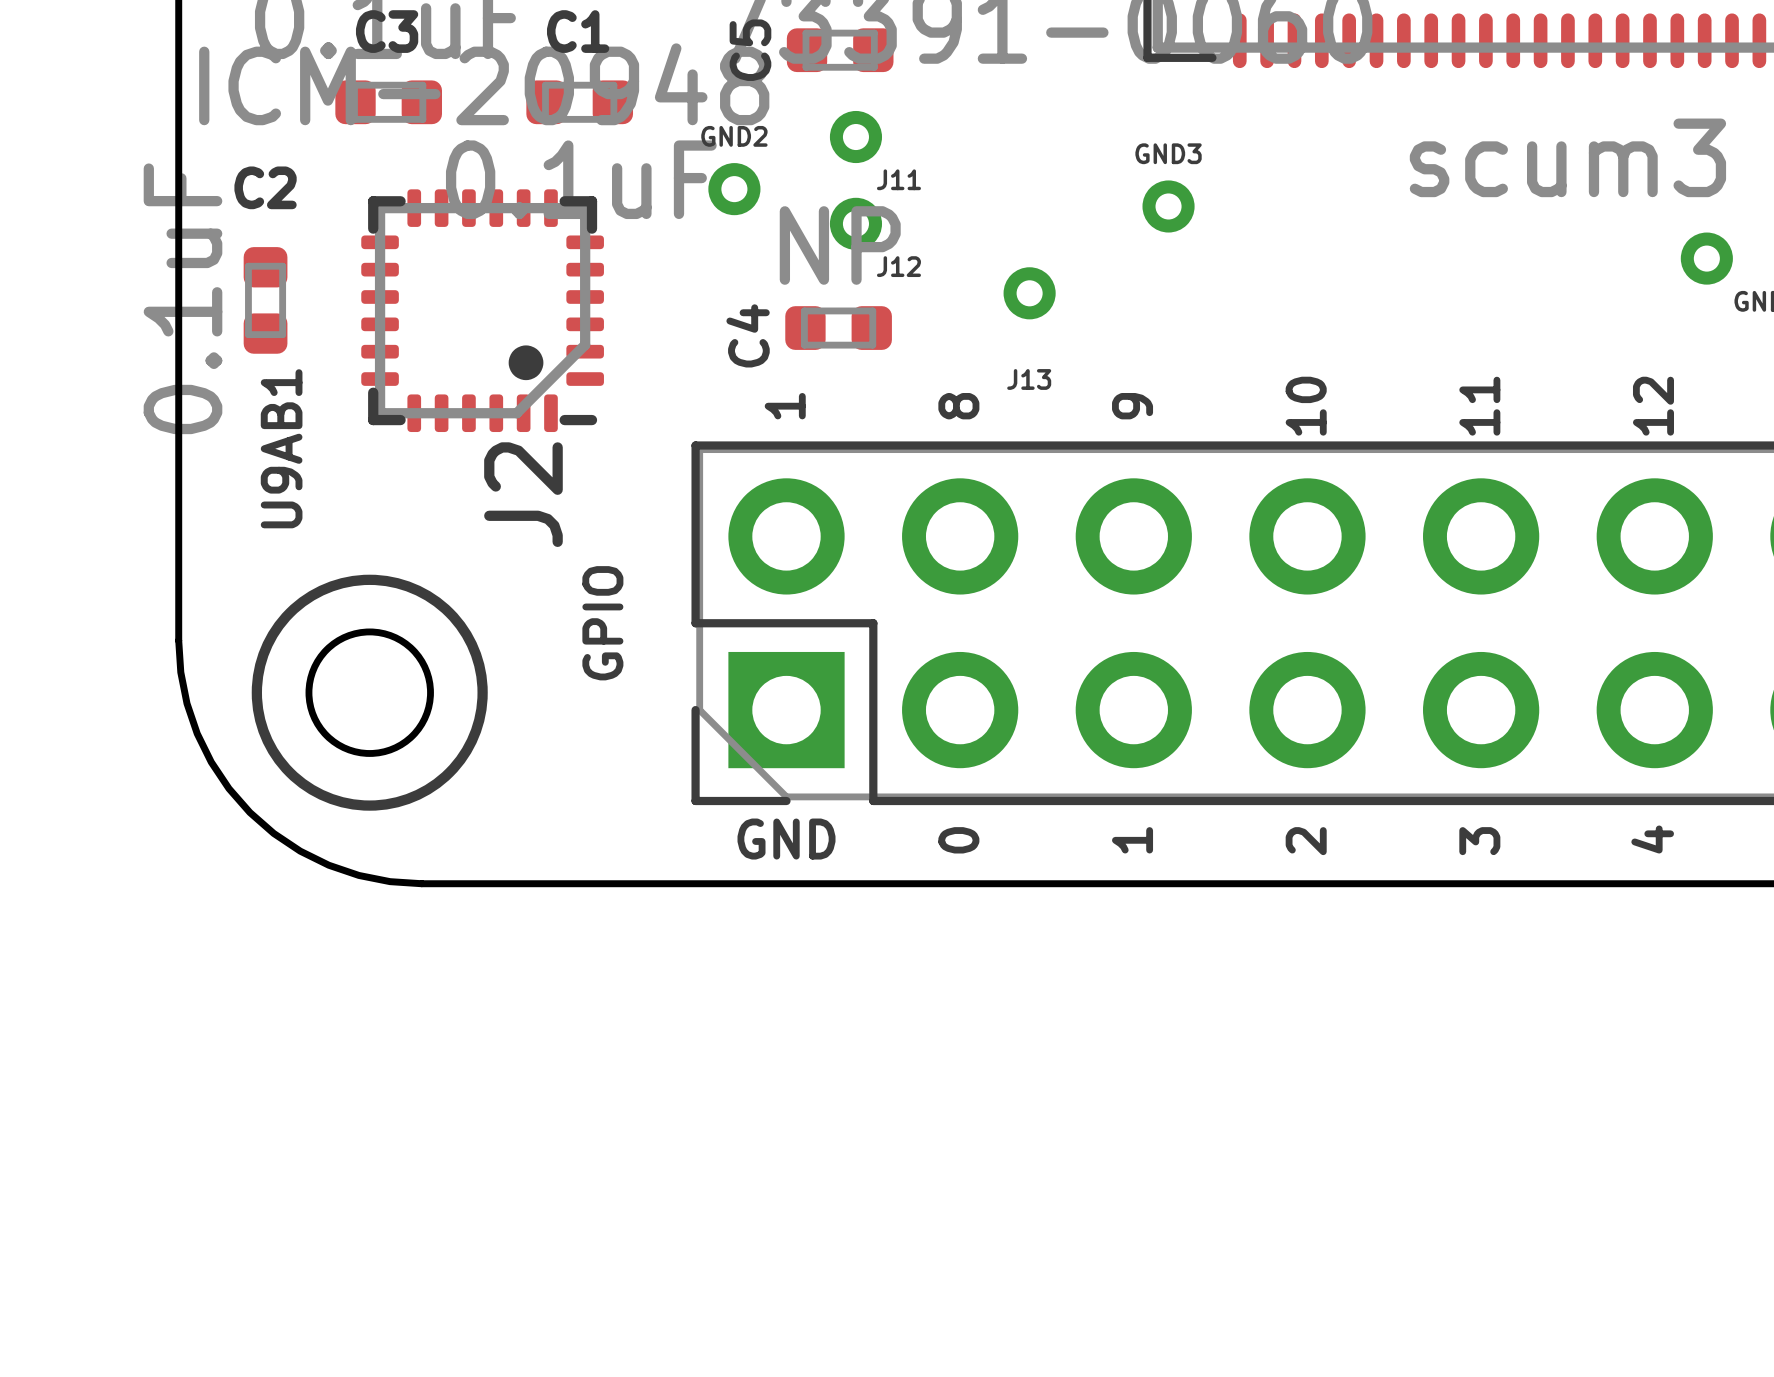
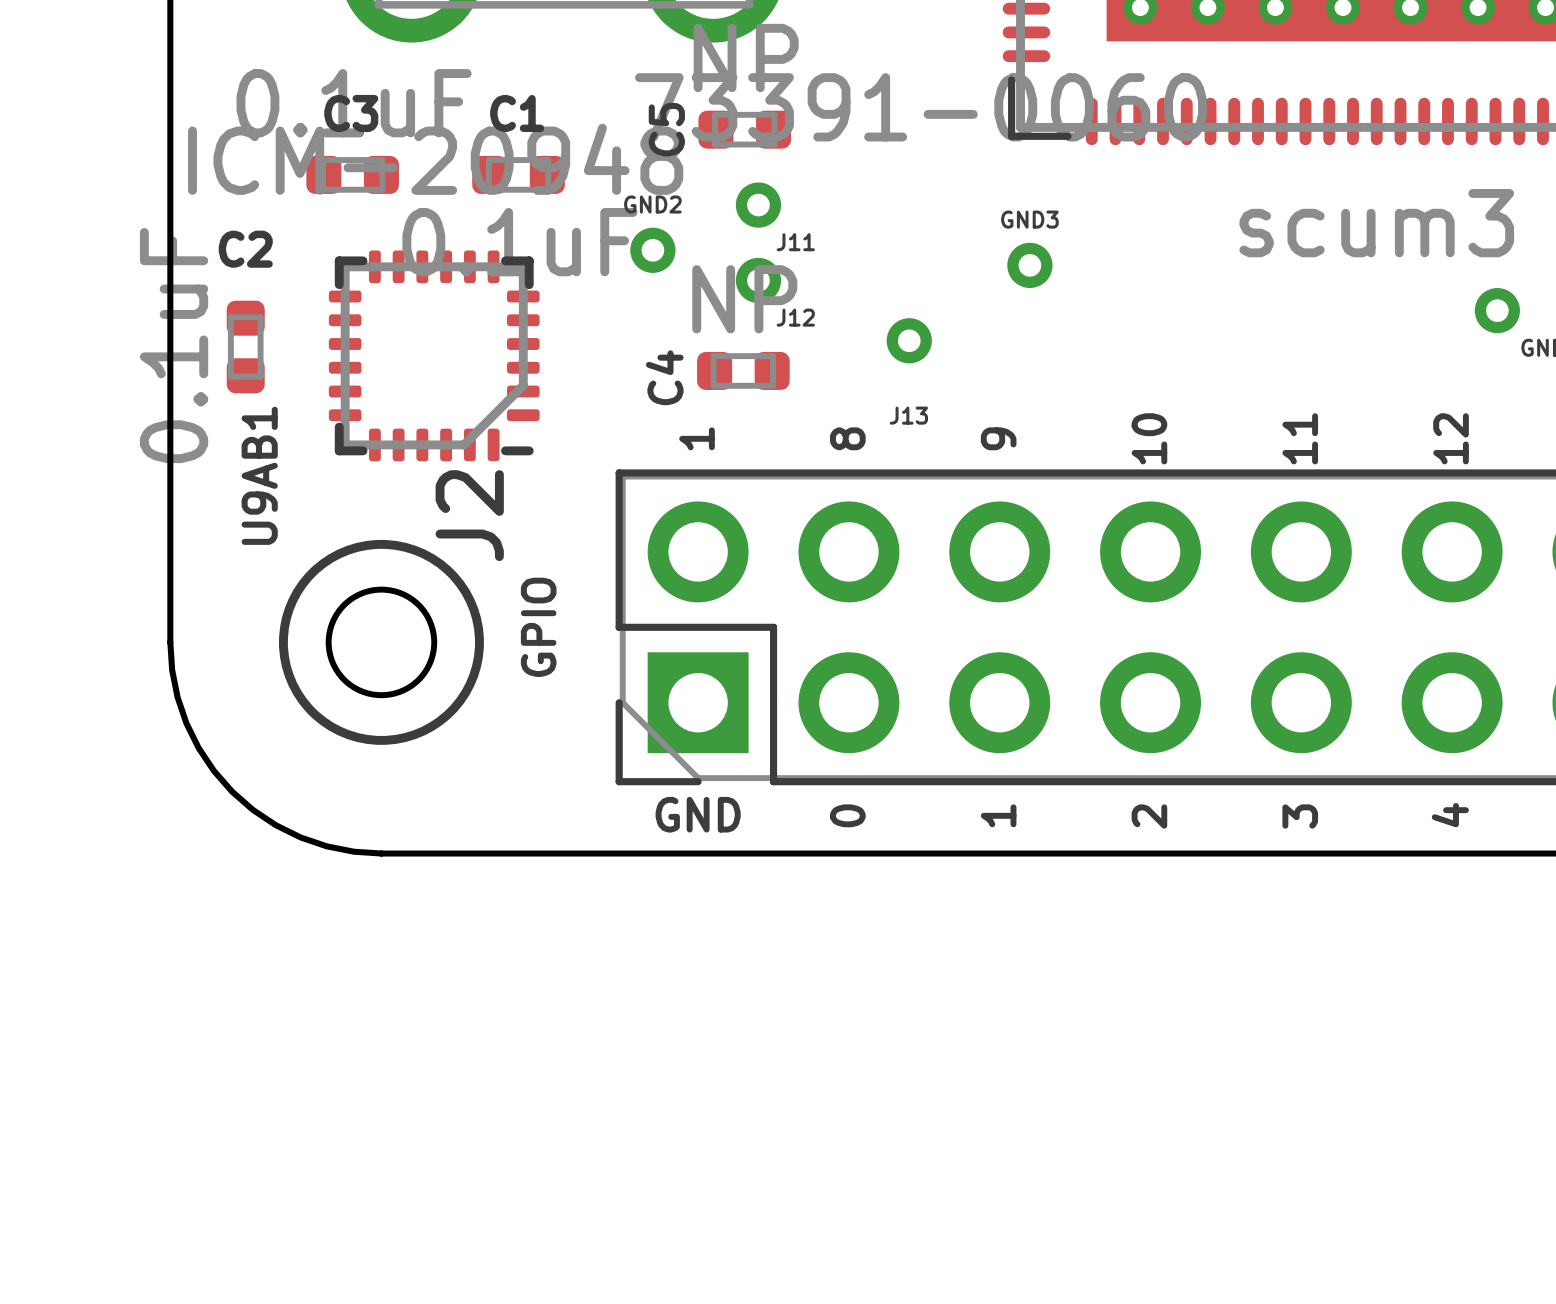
drawing: [508, 345, 544, 381] -> none
drawing position: (369, 692) -> (381, 642)
round board edge position: (369, 692) -> (381, 642)

